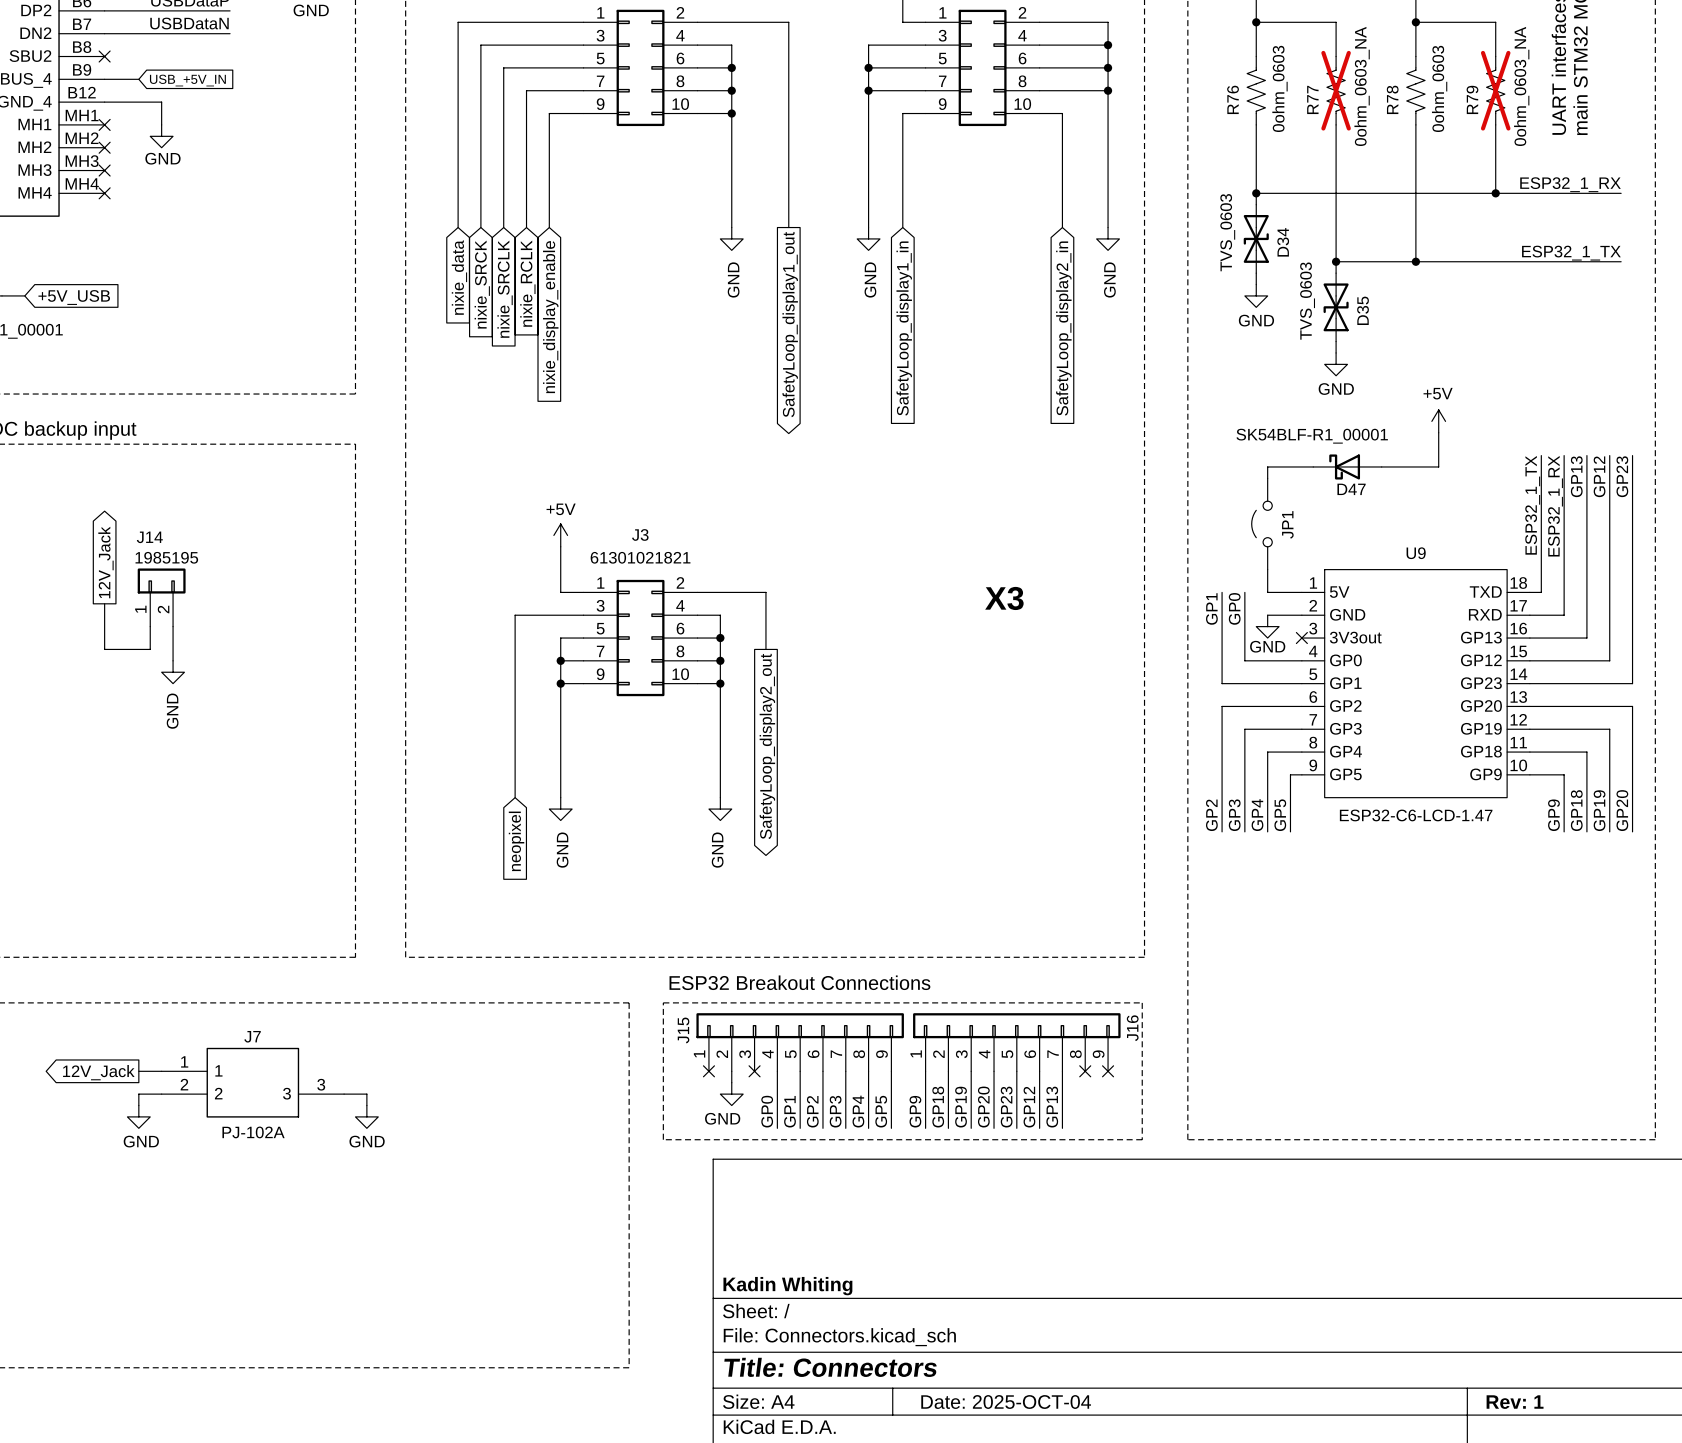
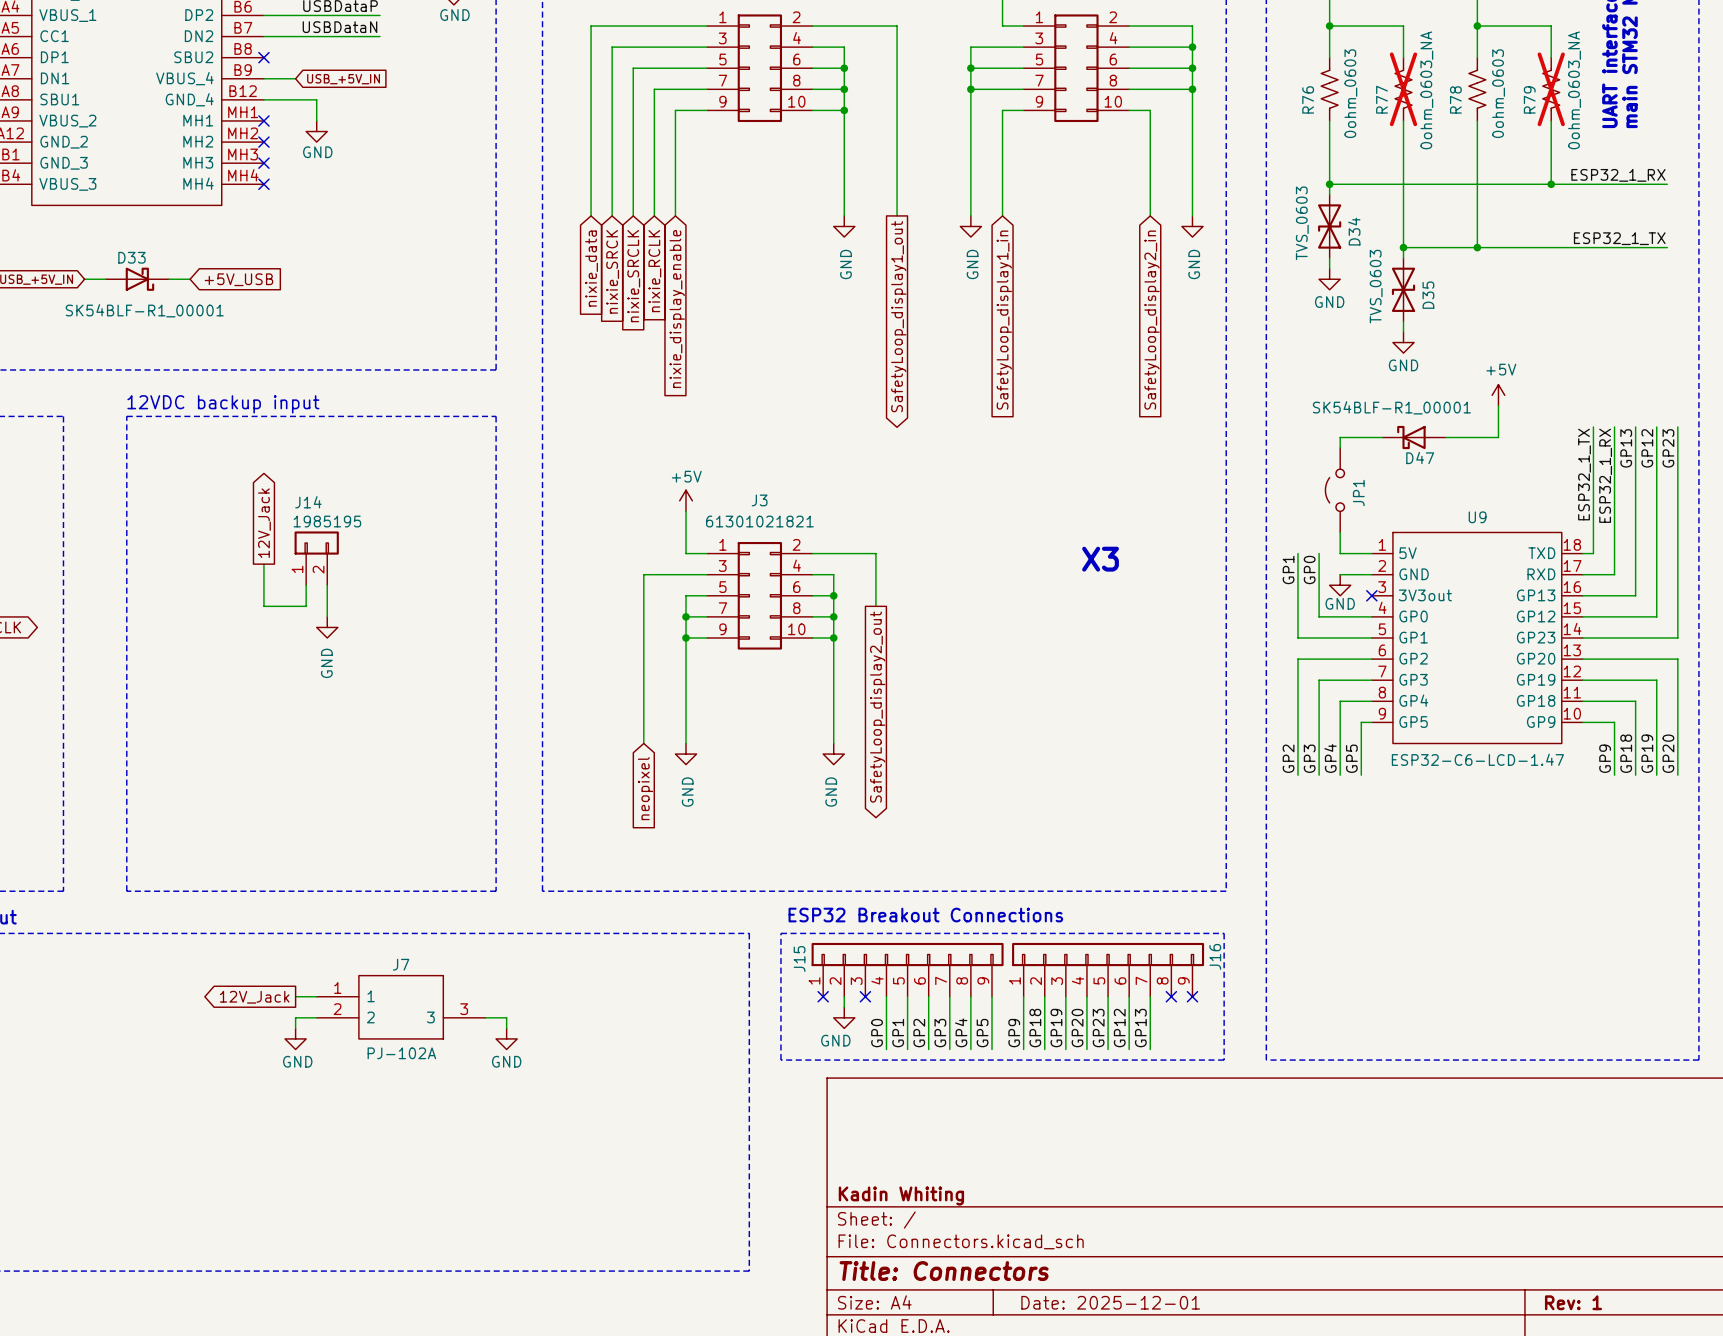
title block: Date: 2025-OCT-04 (1006, 1402) -> Date: 2025-12-01 (1110, 1302)

